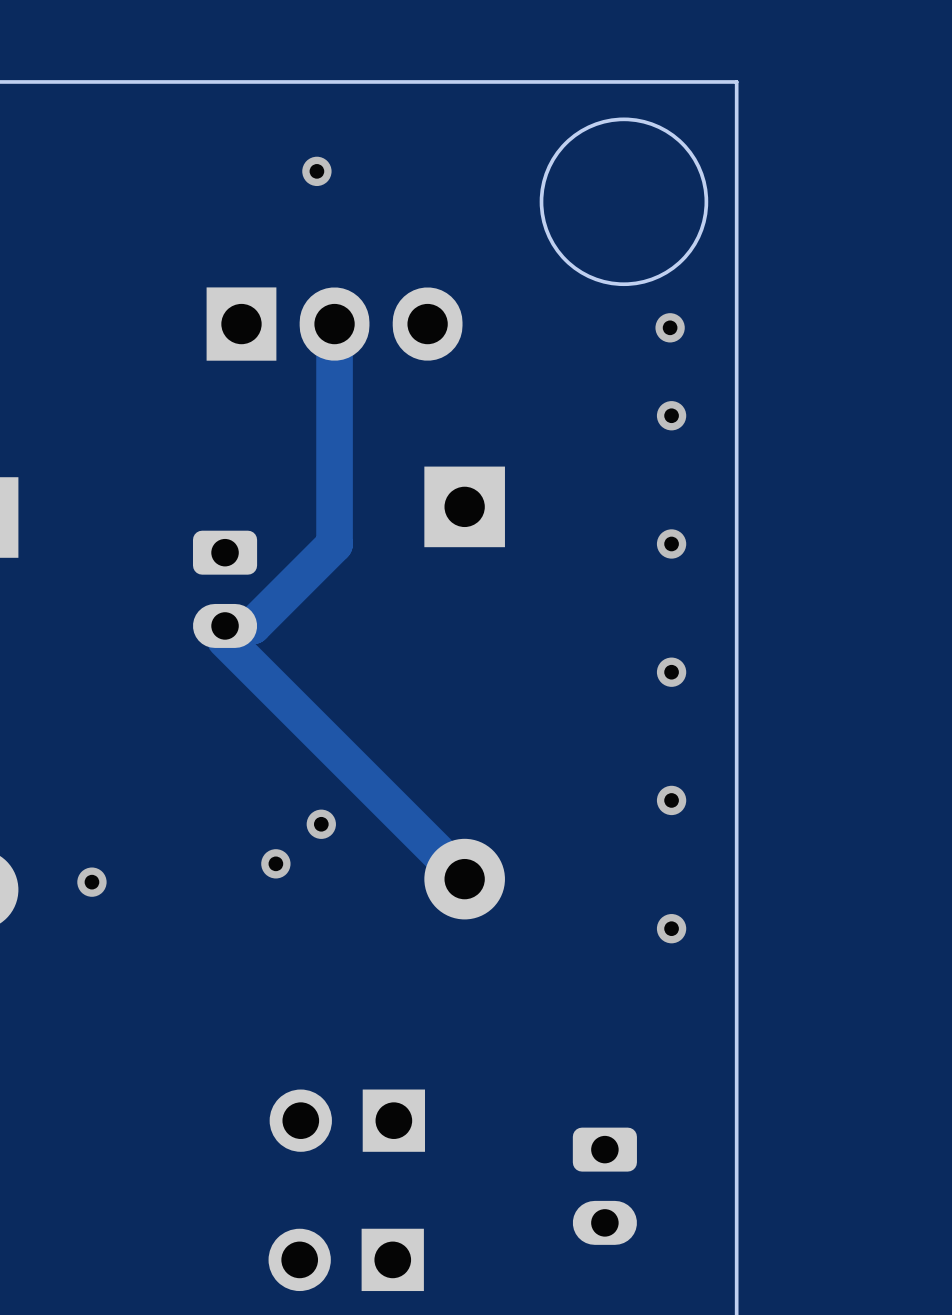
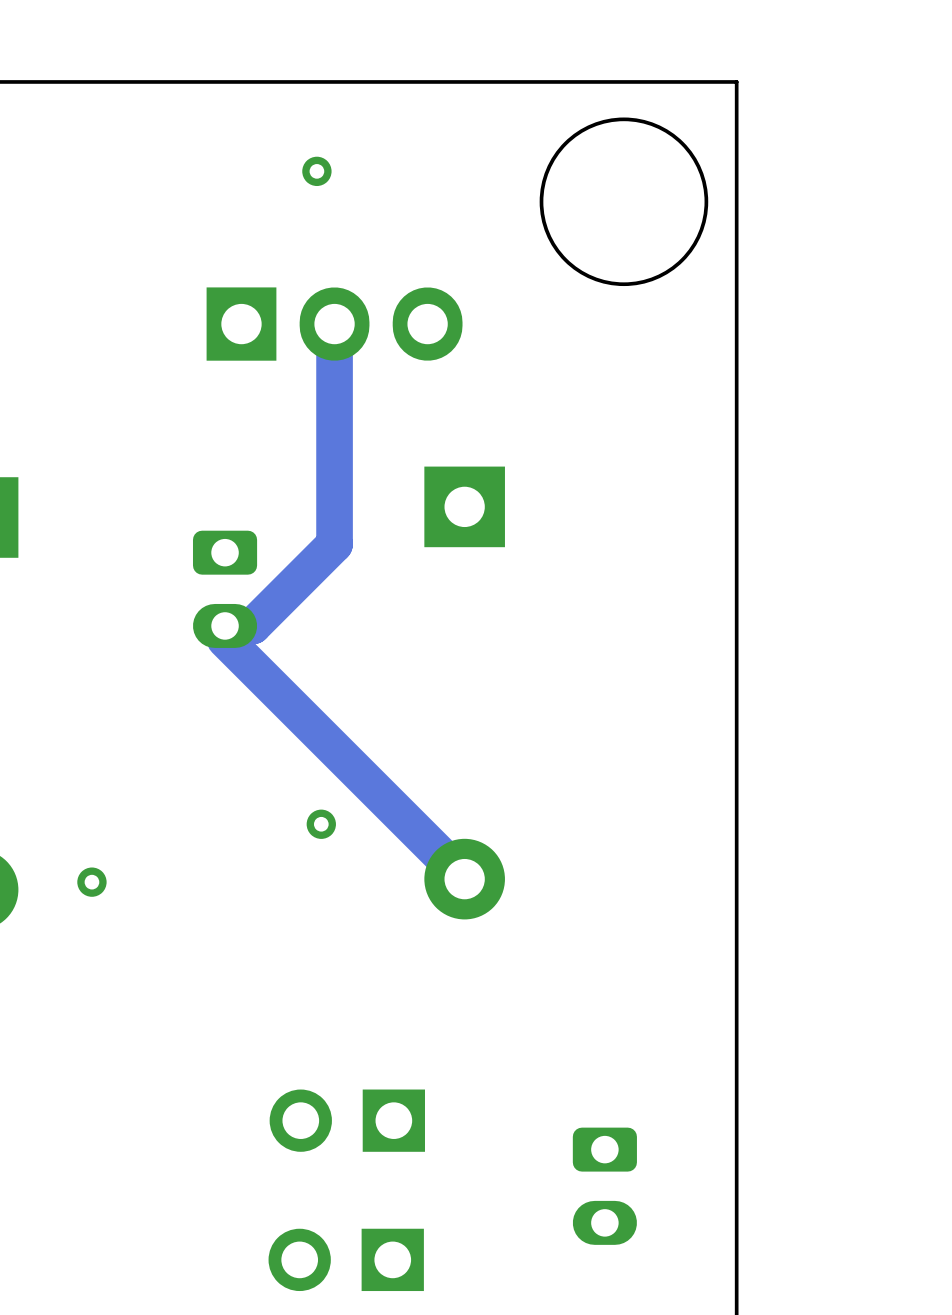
via: (670, 327) -> none
via: (671, 415) -> none
via: (671, 543) -> none
via: (671, 672) -> none
via: (671, 800) -> none
via: (275, 863) -> none
via: (671, 928) -> none

